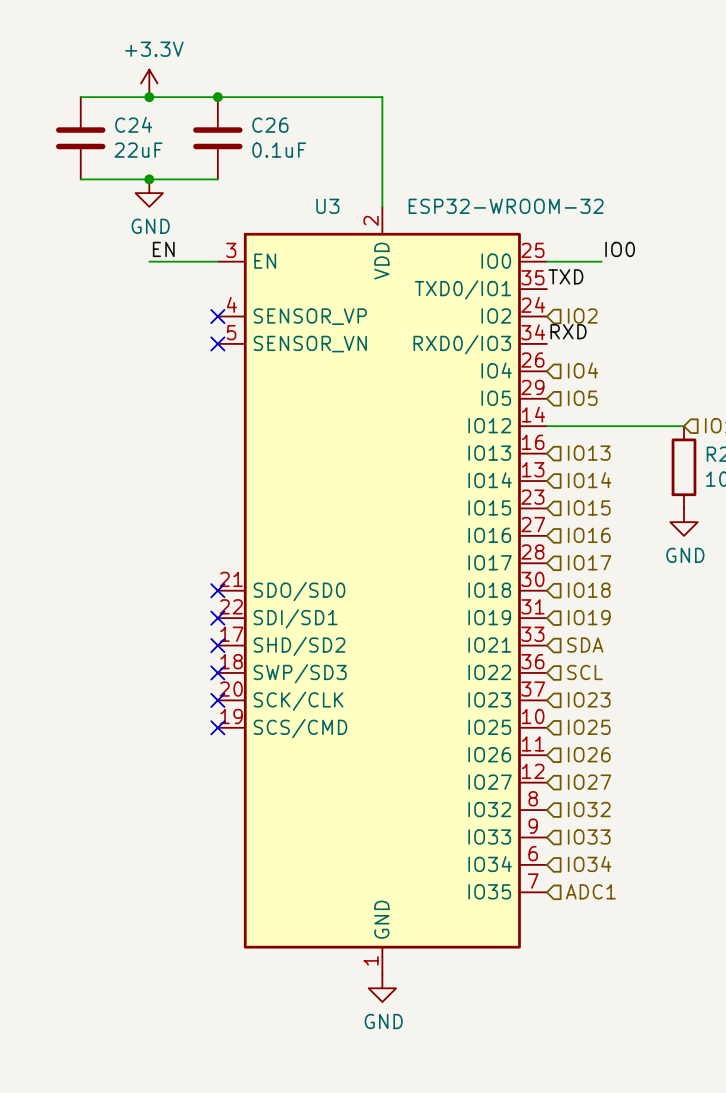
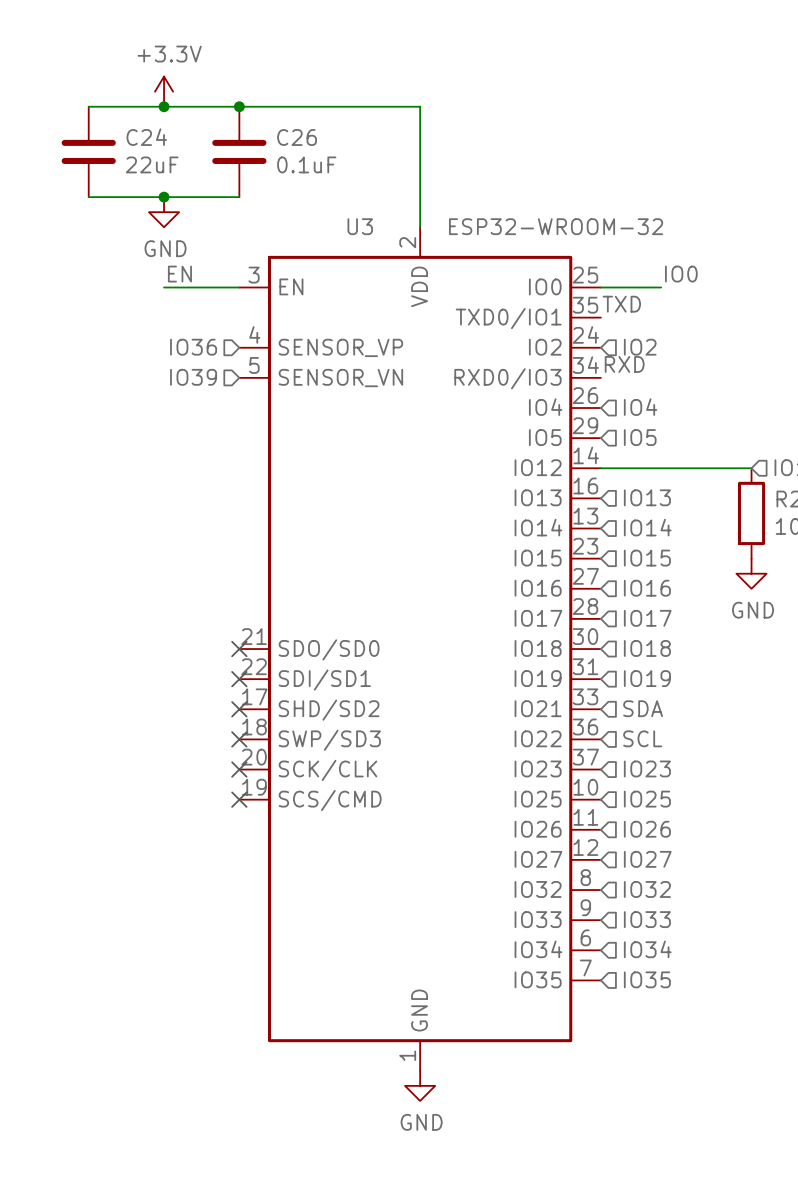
hierarchical label: none -> IO36 (193, 347)
no-connect mark: (217, 316) -> none
hierarchical label: none -> IO39 (193, 377)
no-connect mark: (217, 343) -> none
hierarchical label: ADC1 (590, 891) -> IO35 (647, 979)

